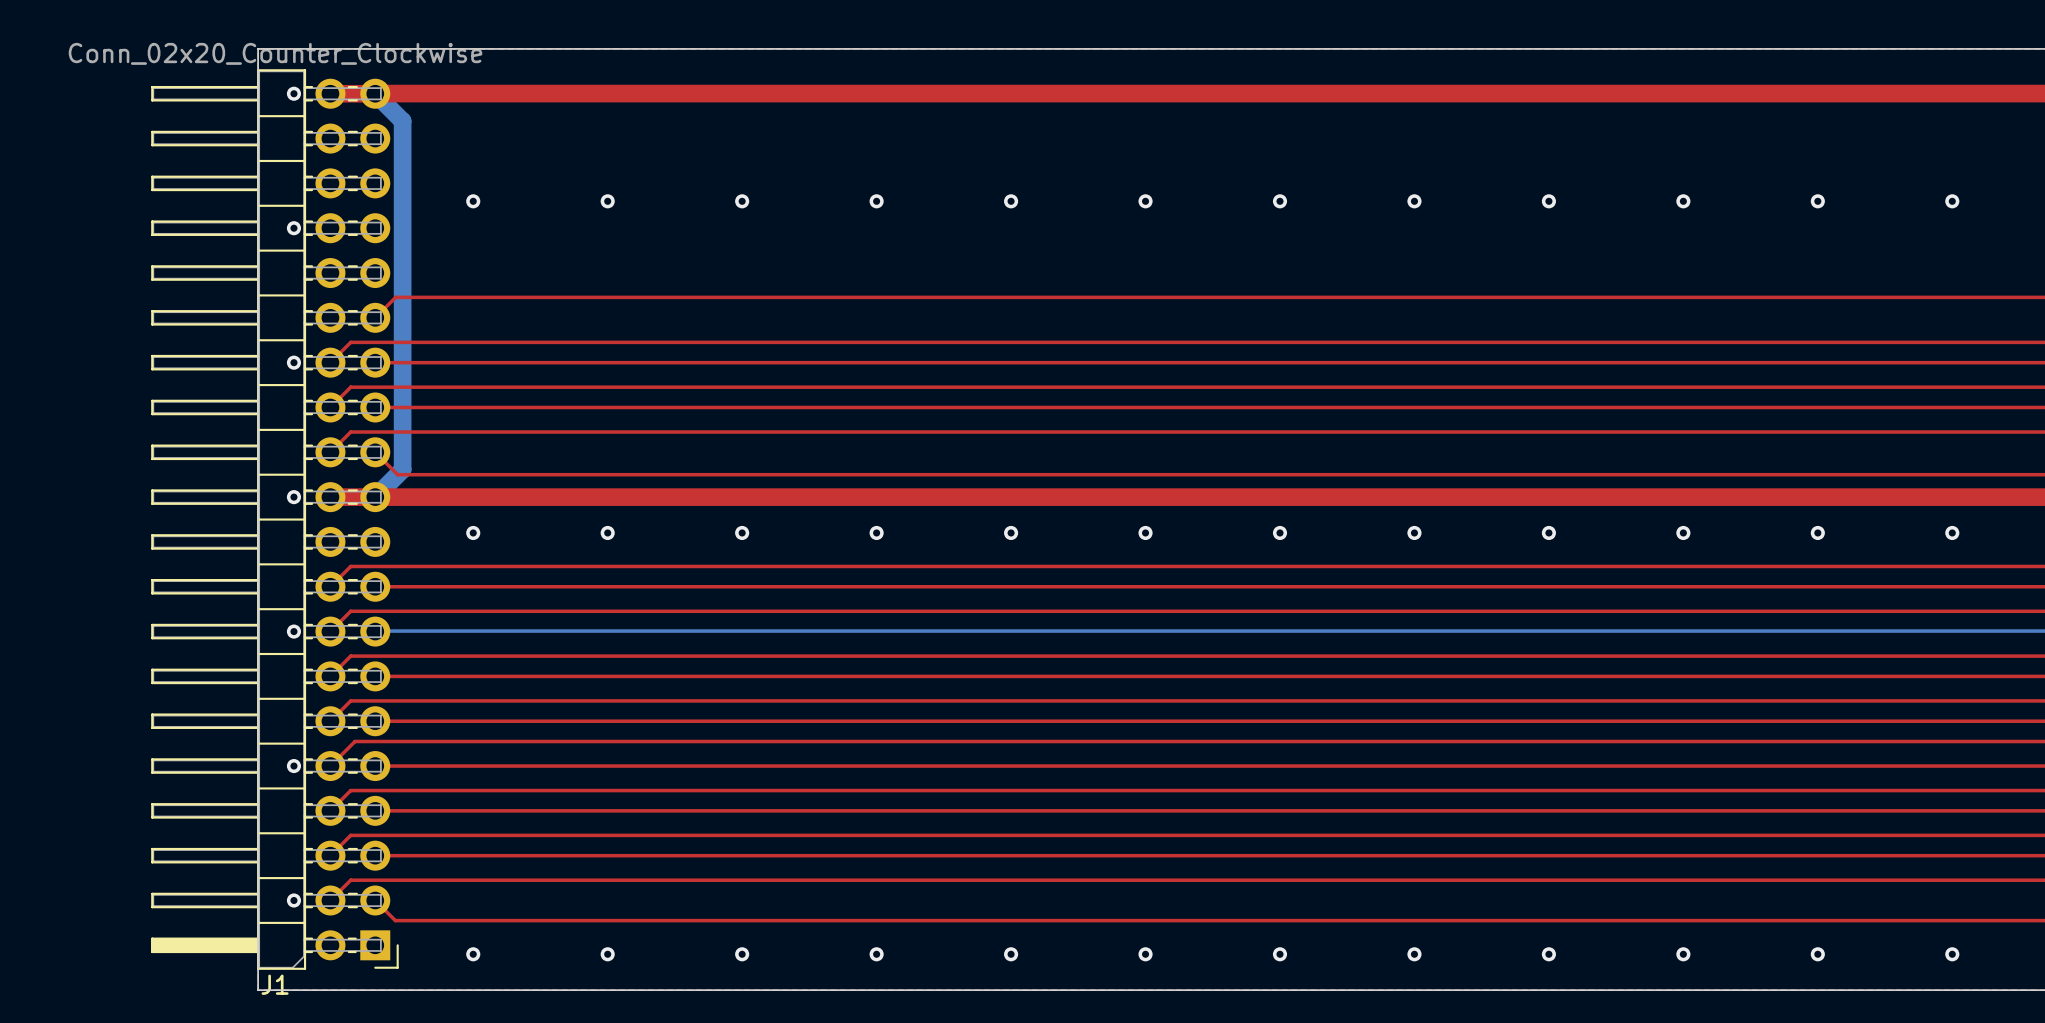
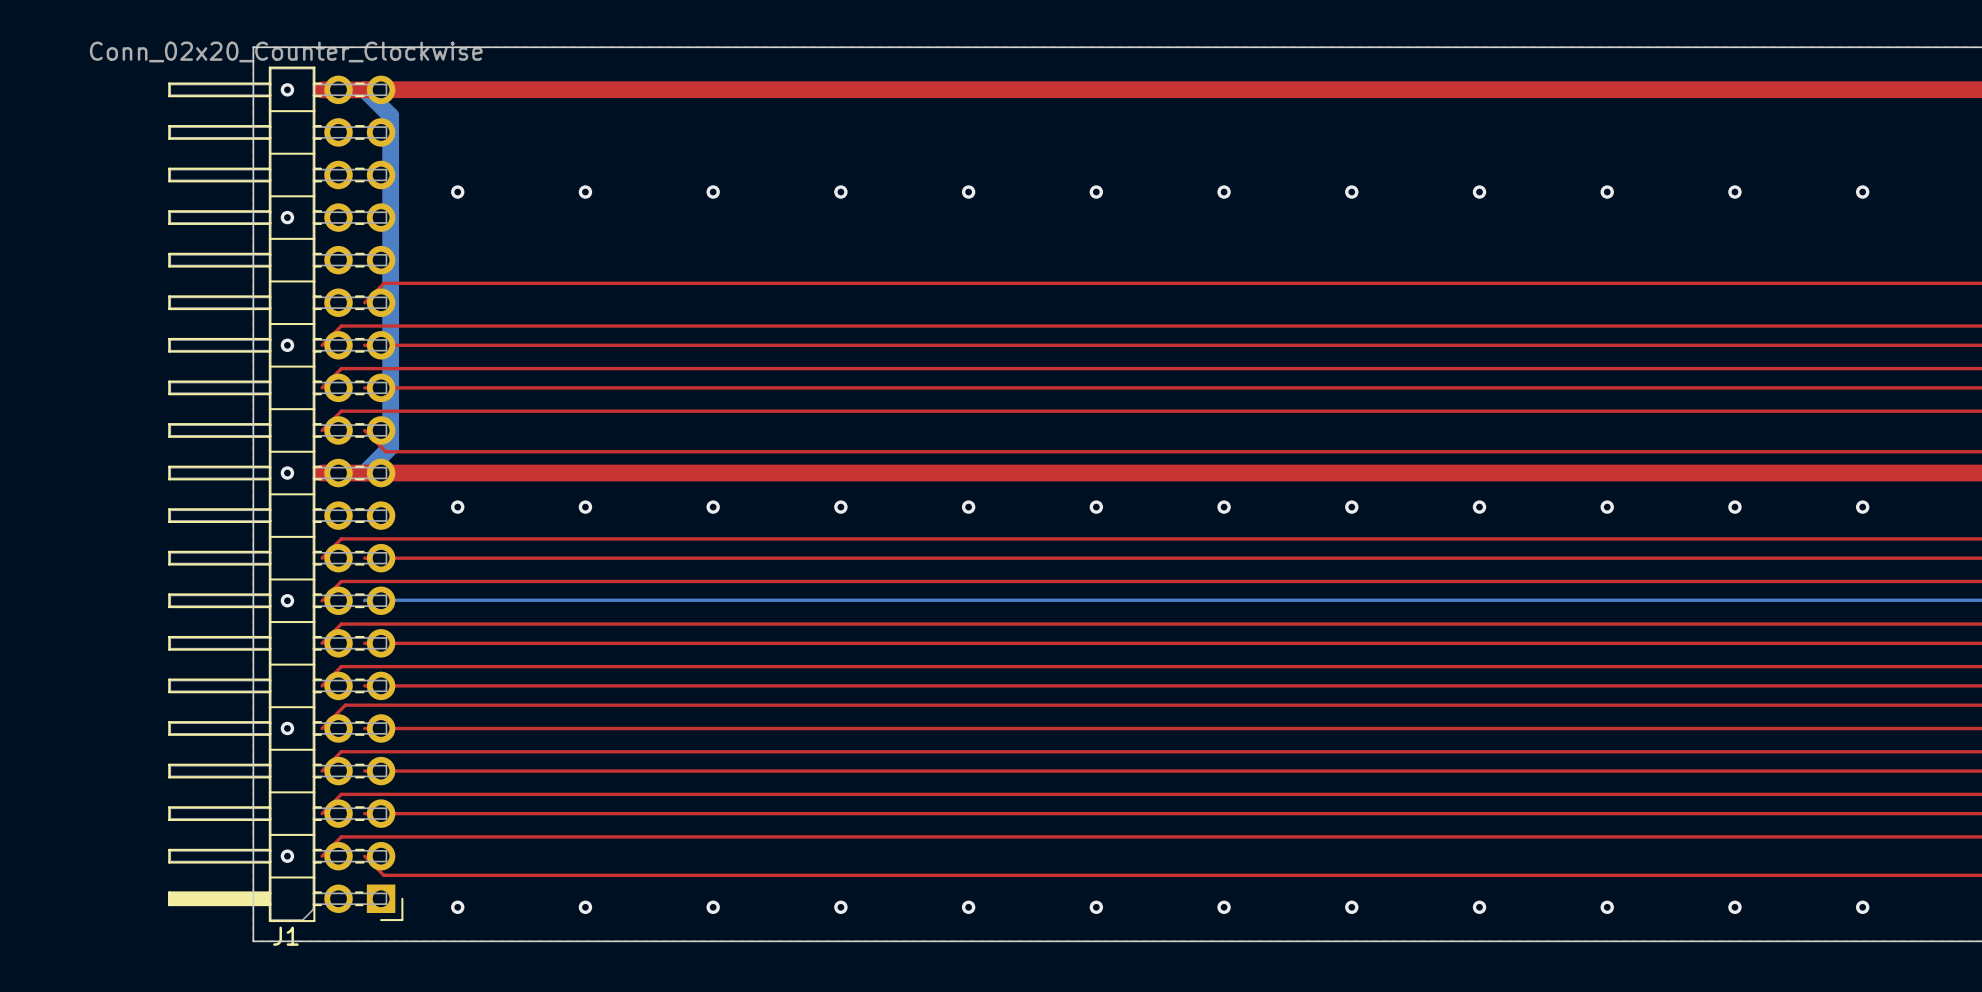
J1 position: (274, 519) -> (285, 494)

